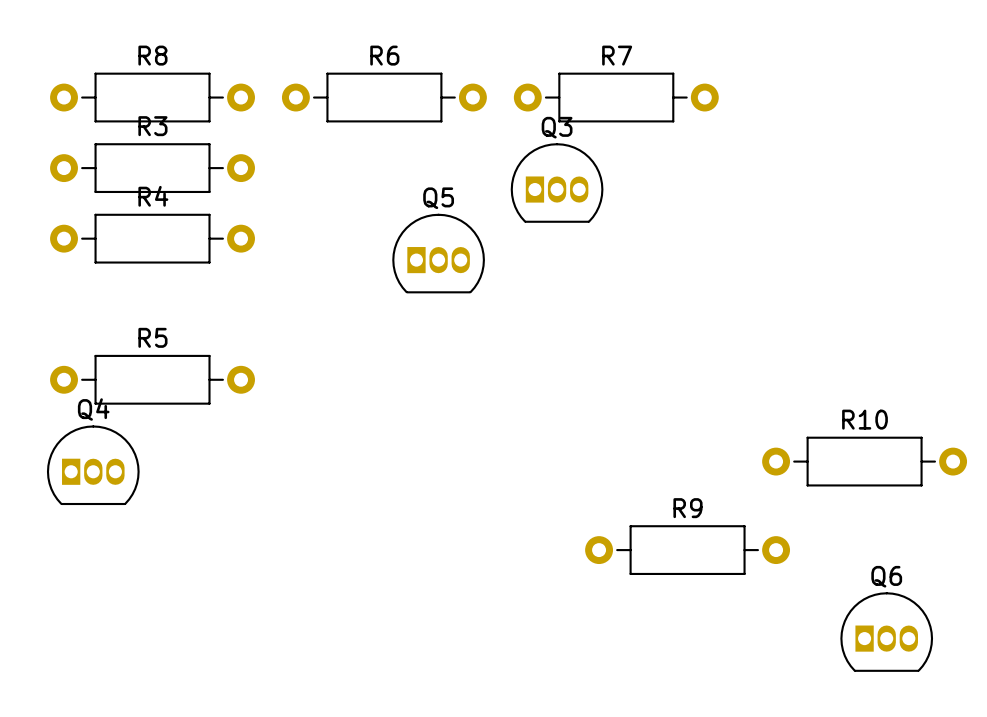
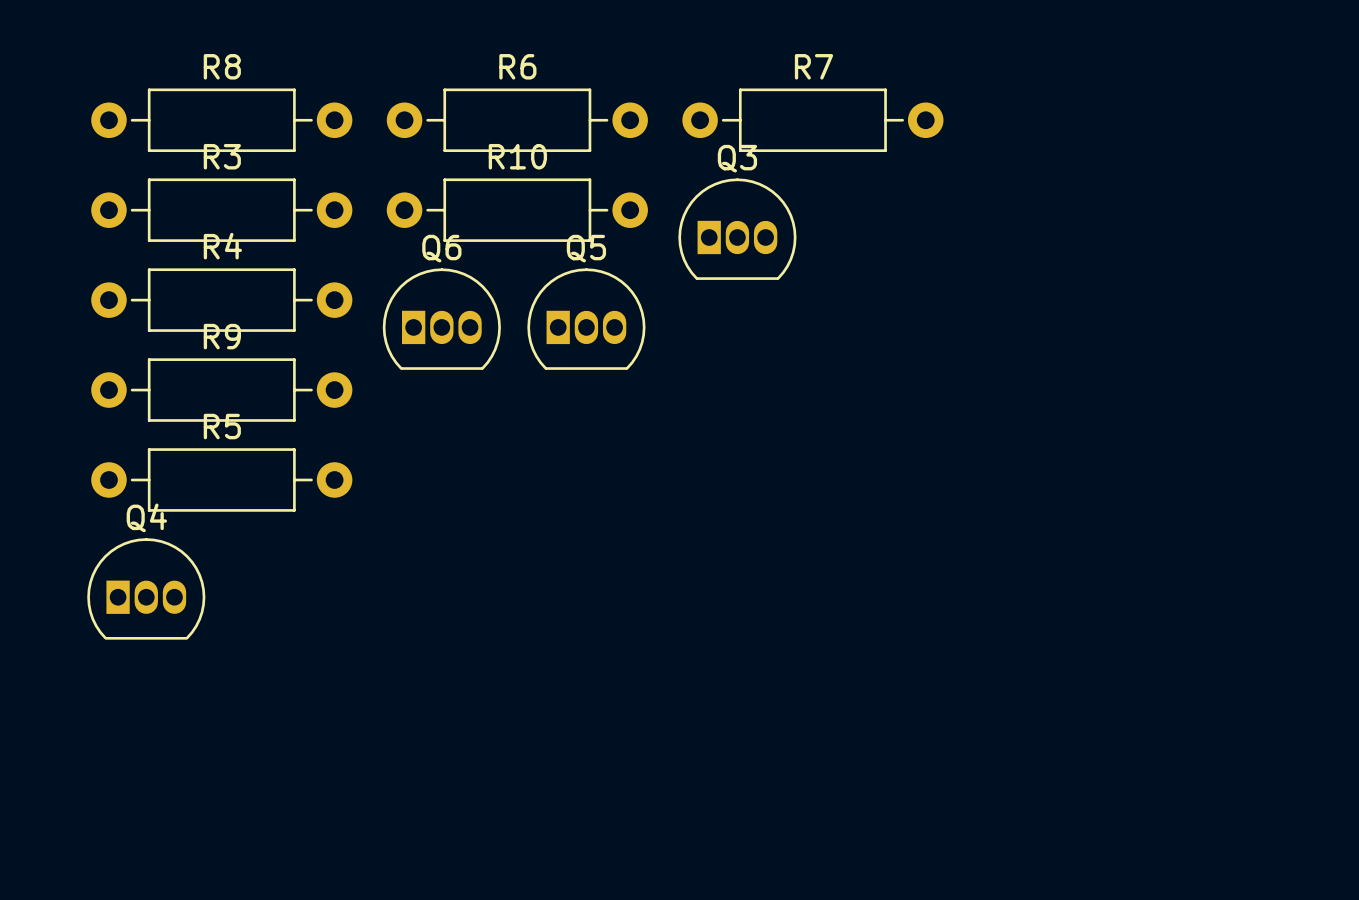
R10 position: (864, 461) -> (517, 210)
R9 position: (687, 550) -> (221, 390)
Q6 position: (886, 632) -> (441, 319)

